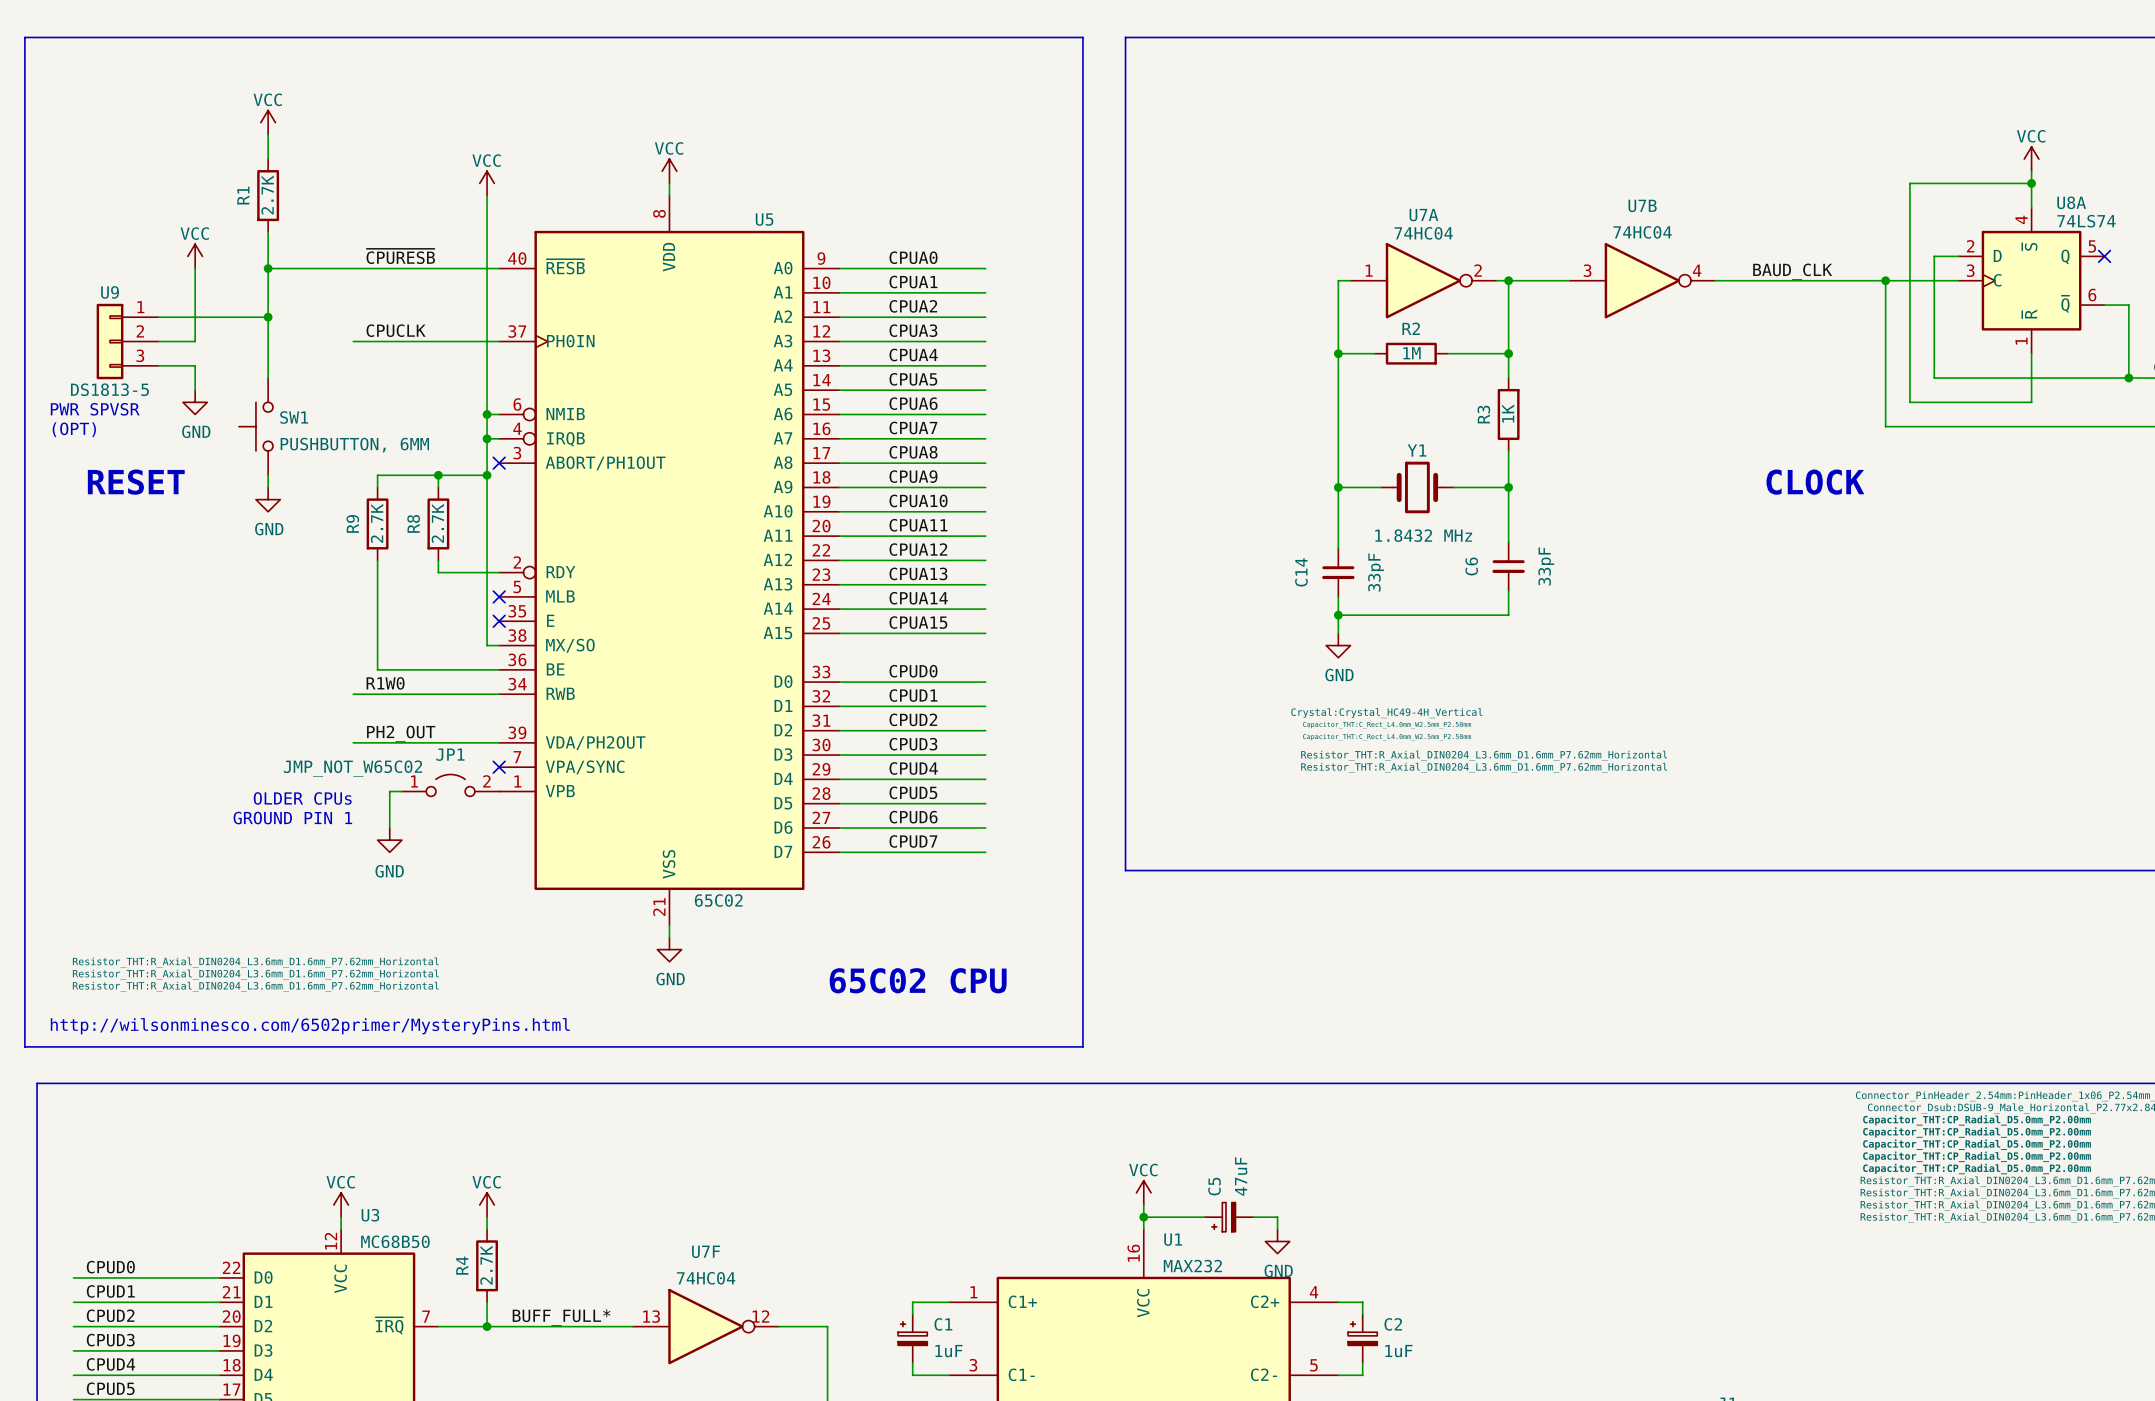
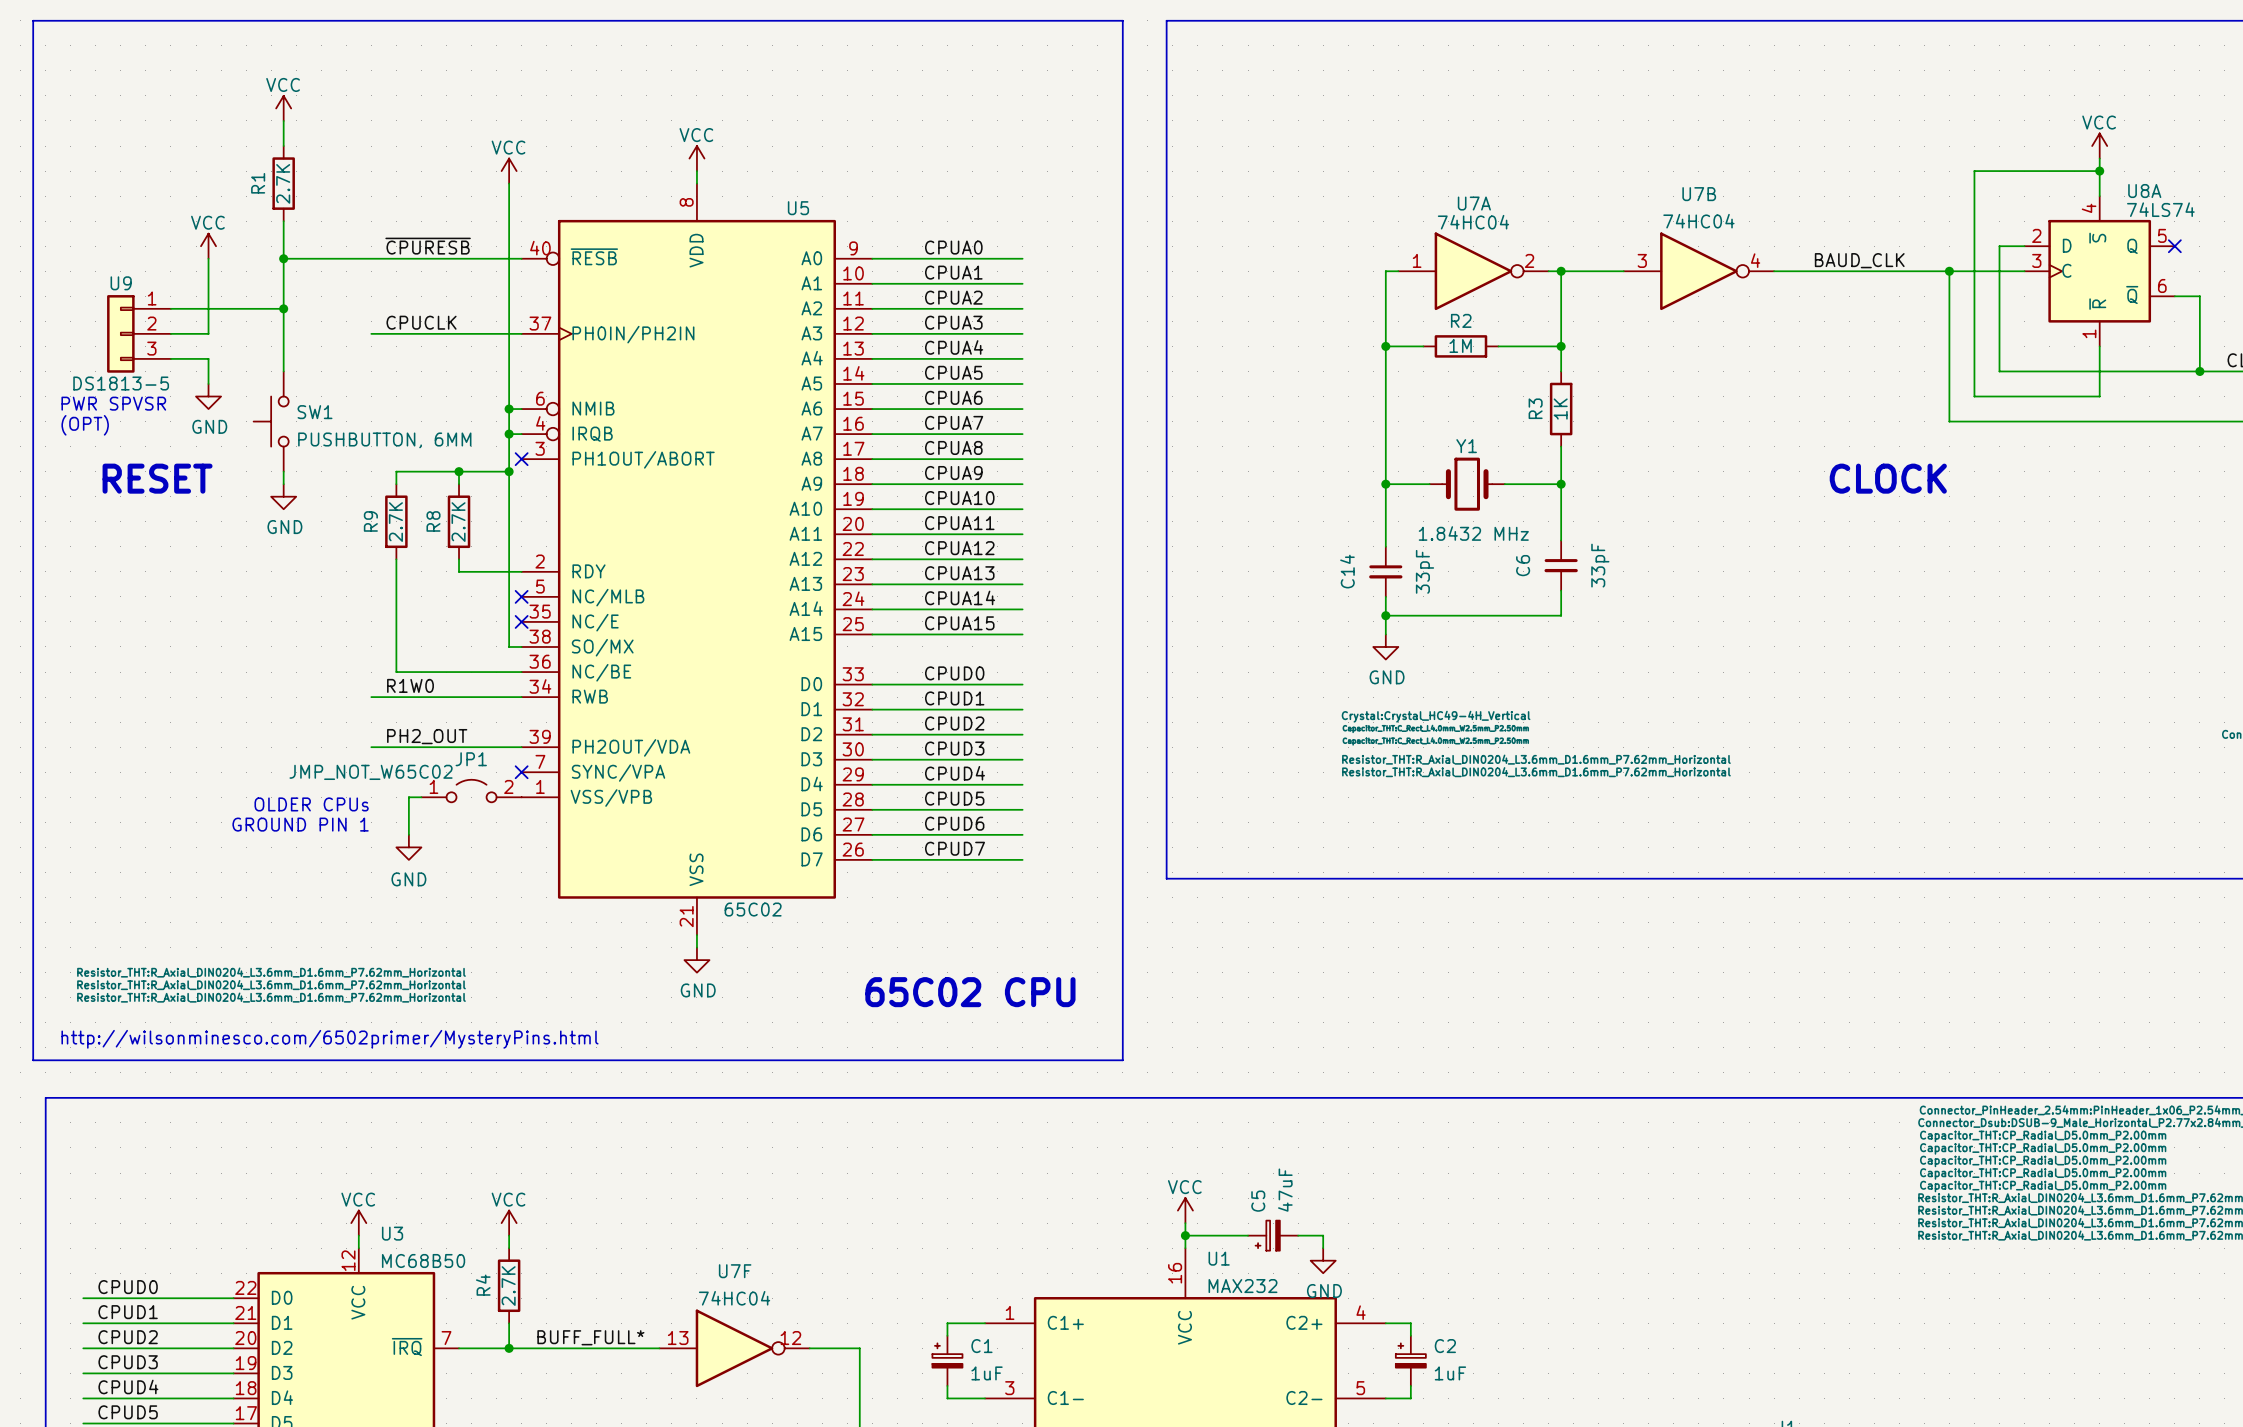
U5 symbol: [499, 195, 840, 926] -> [521, 183, 873, 936]

